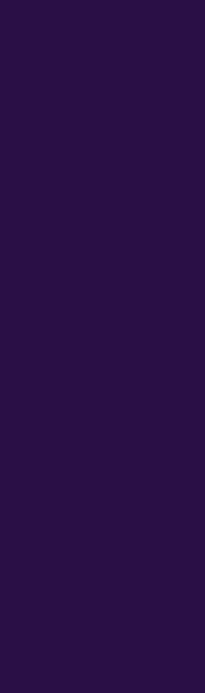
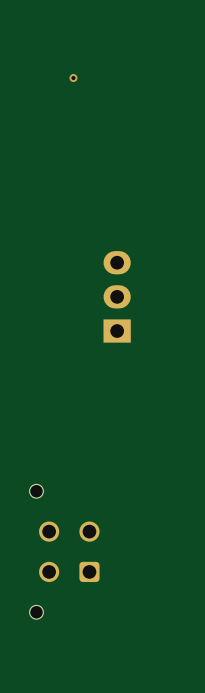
via: none -> (73, 78)
part: none -> (117, 296)
part: none -> (64, 551)

